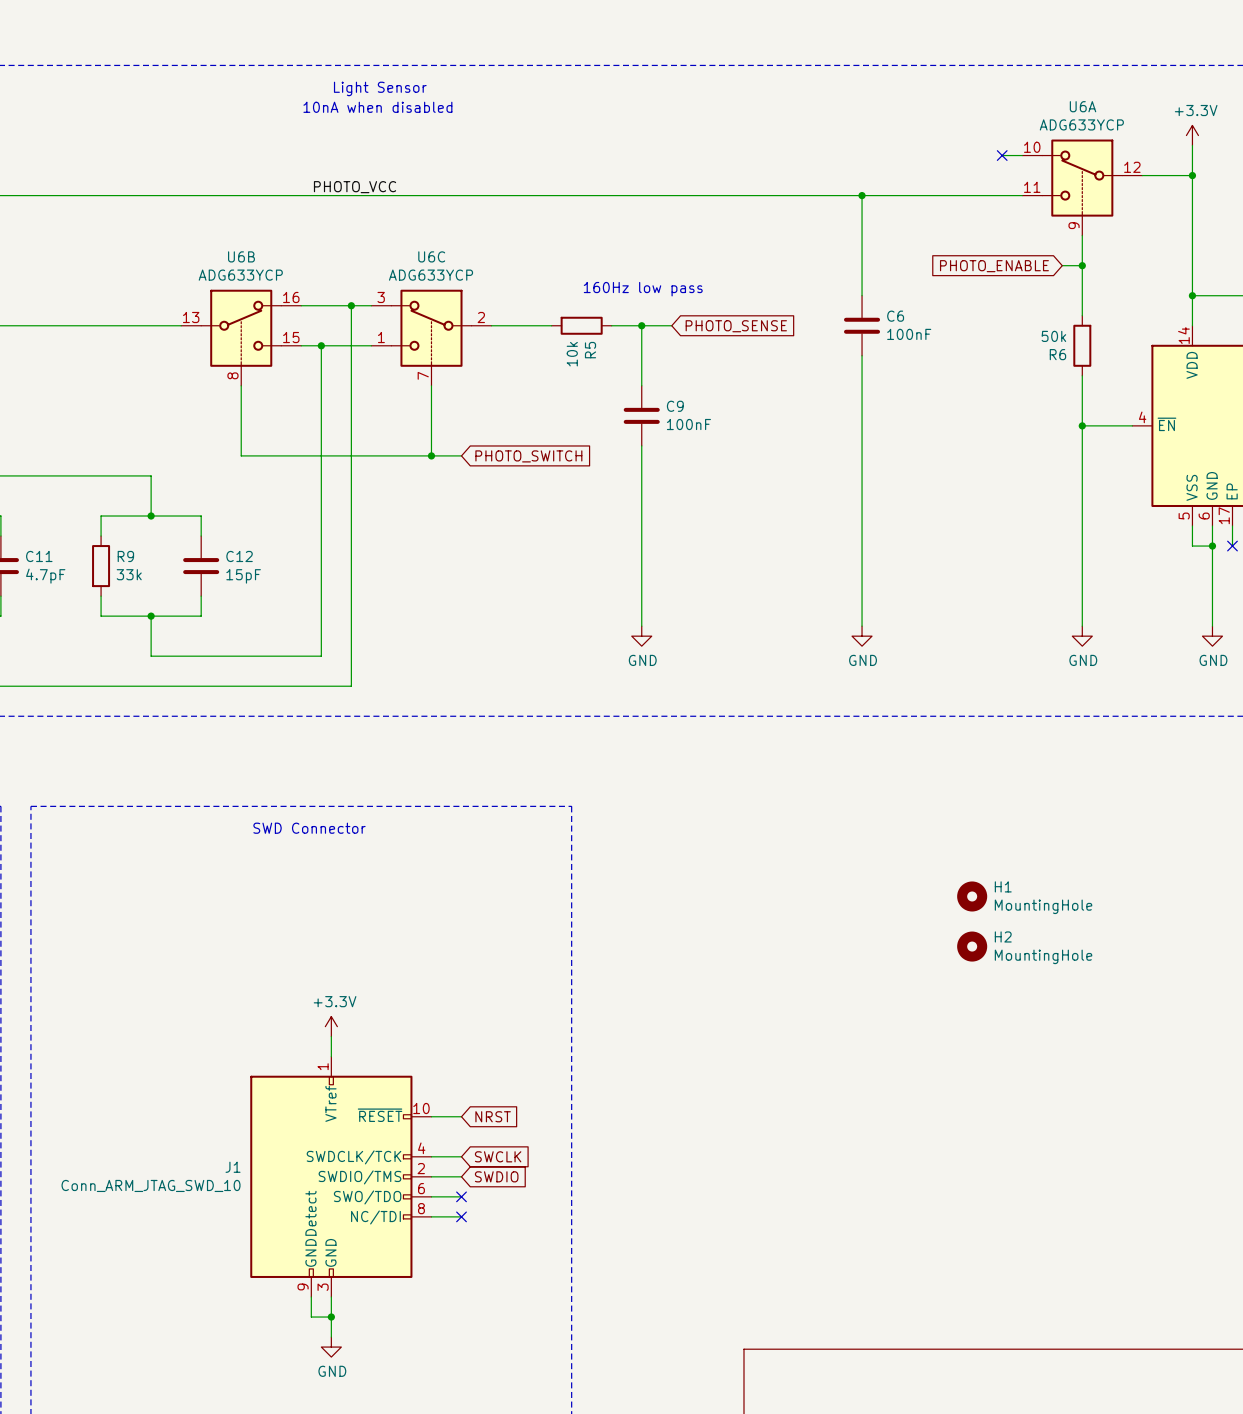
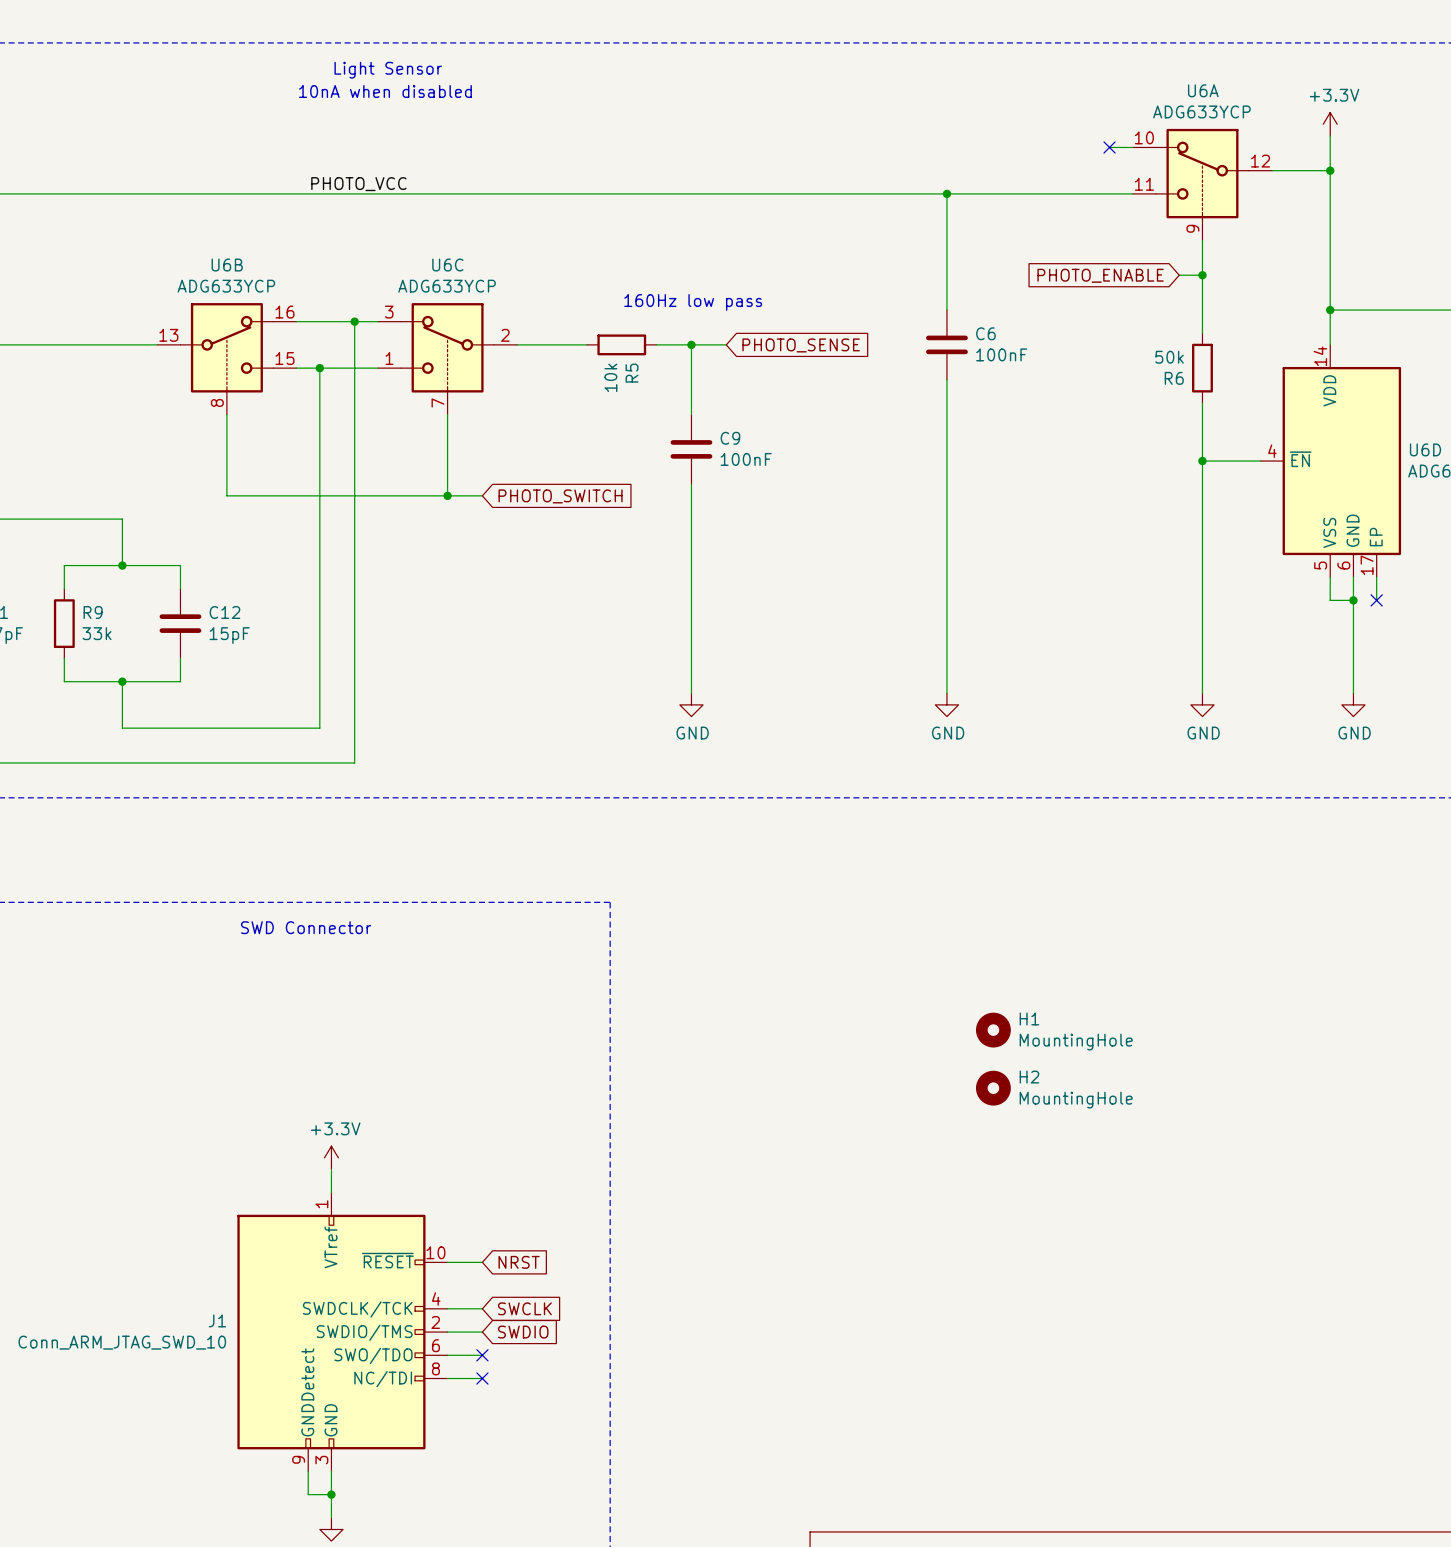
H1 position: (972, 896) -> (993, 1030)
H2 position: (972, 946) -> (993, 1088)

